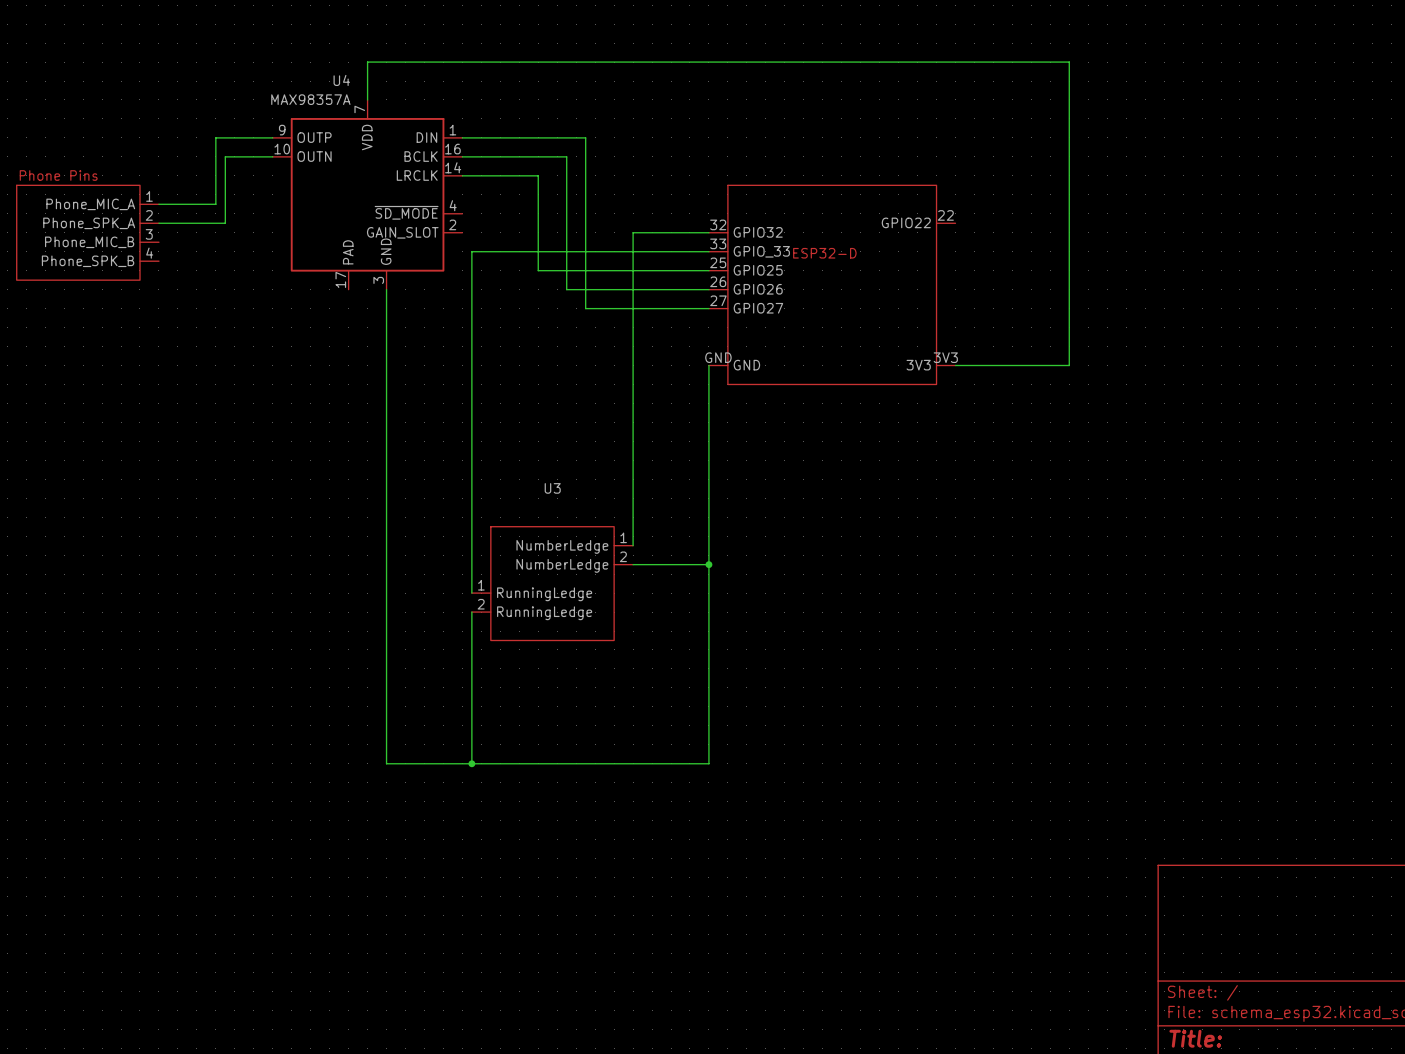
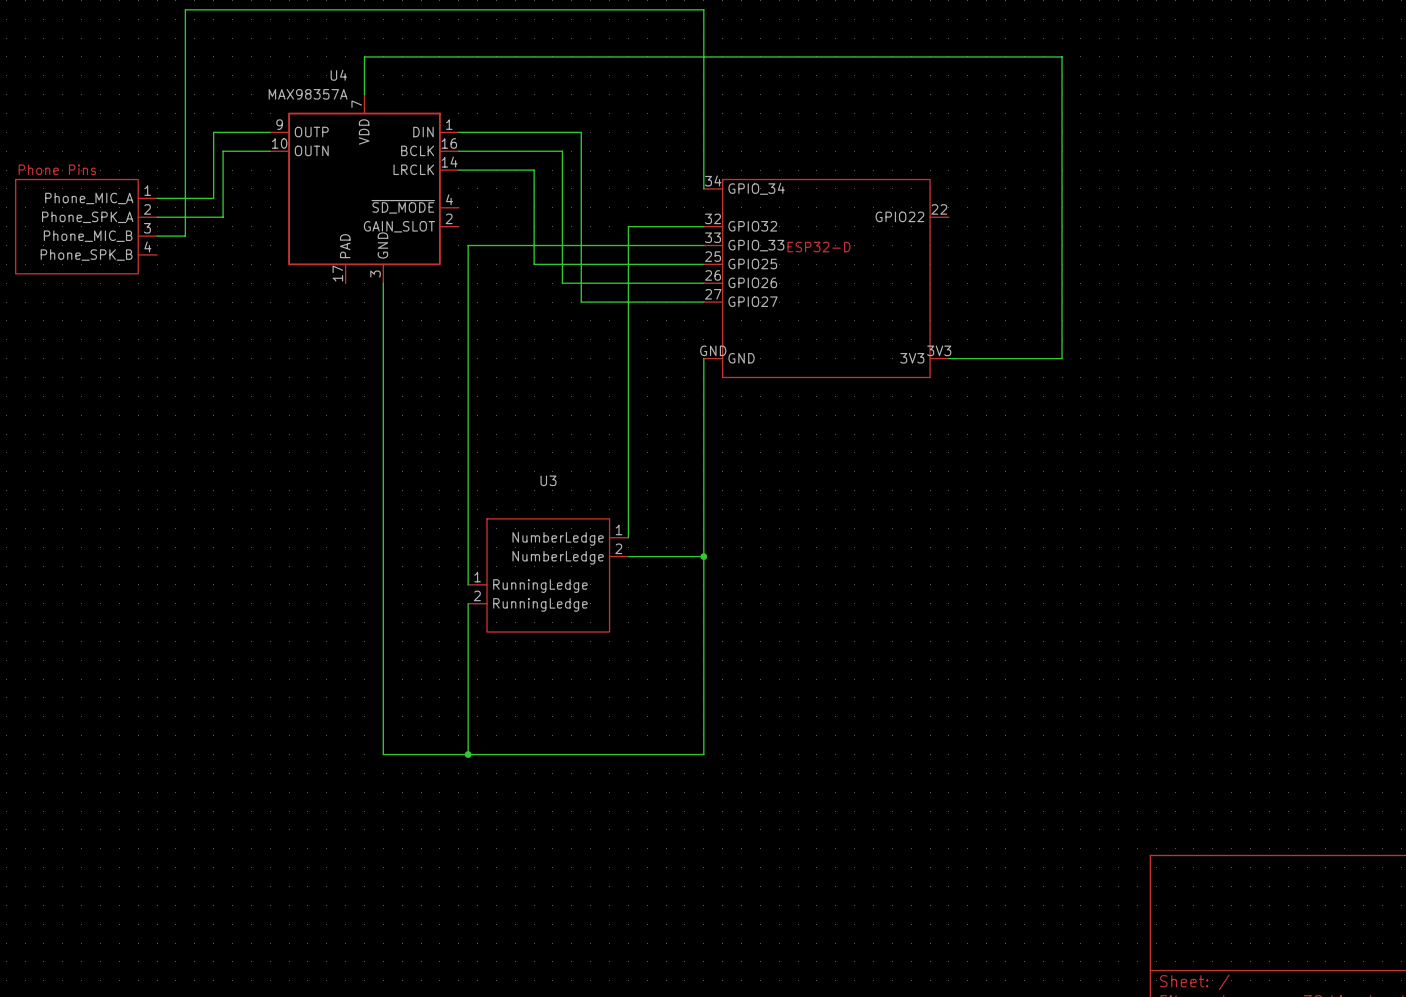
part symbol: [708, 185, 956, 385] -> [703, 179, 949, 378]
wire: none -> (703, 188) (703, 9) (185, 9) (185, 236) (157, 236)

